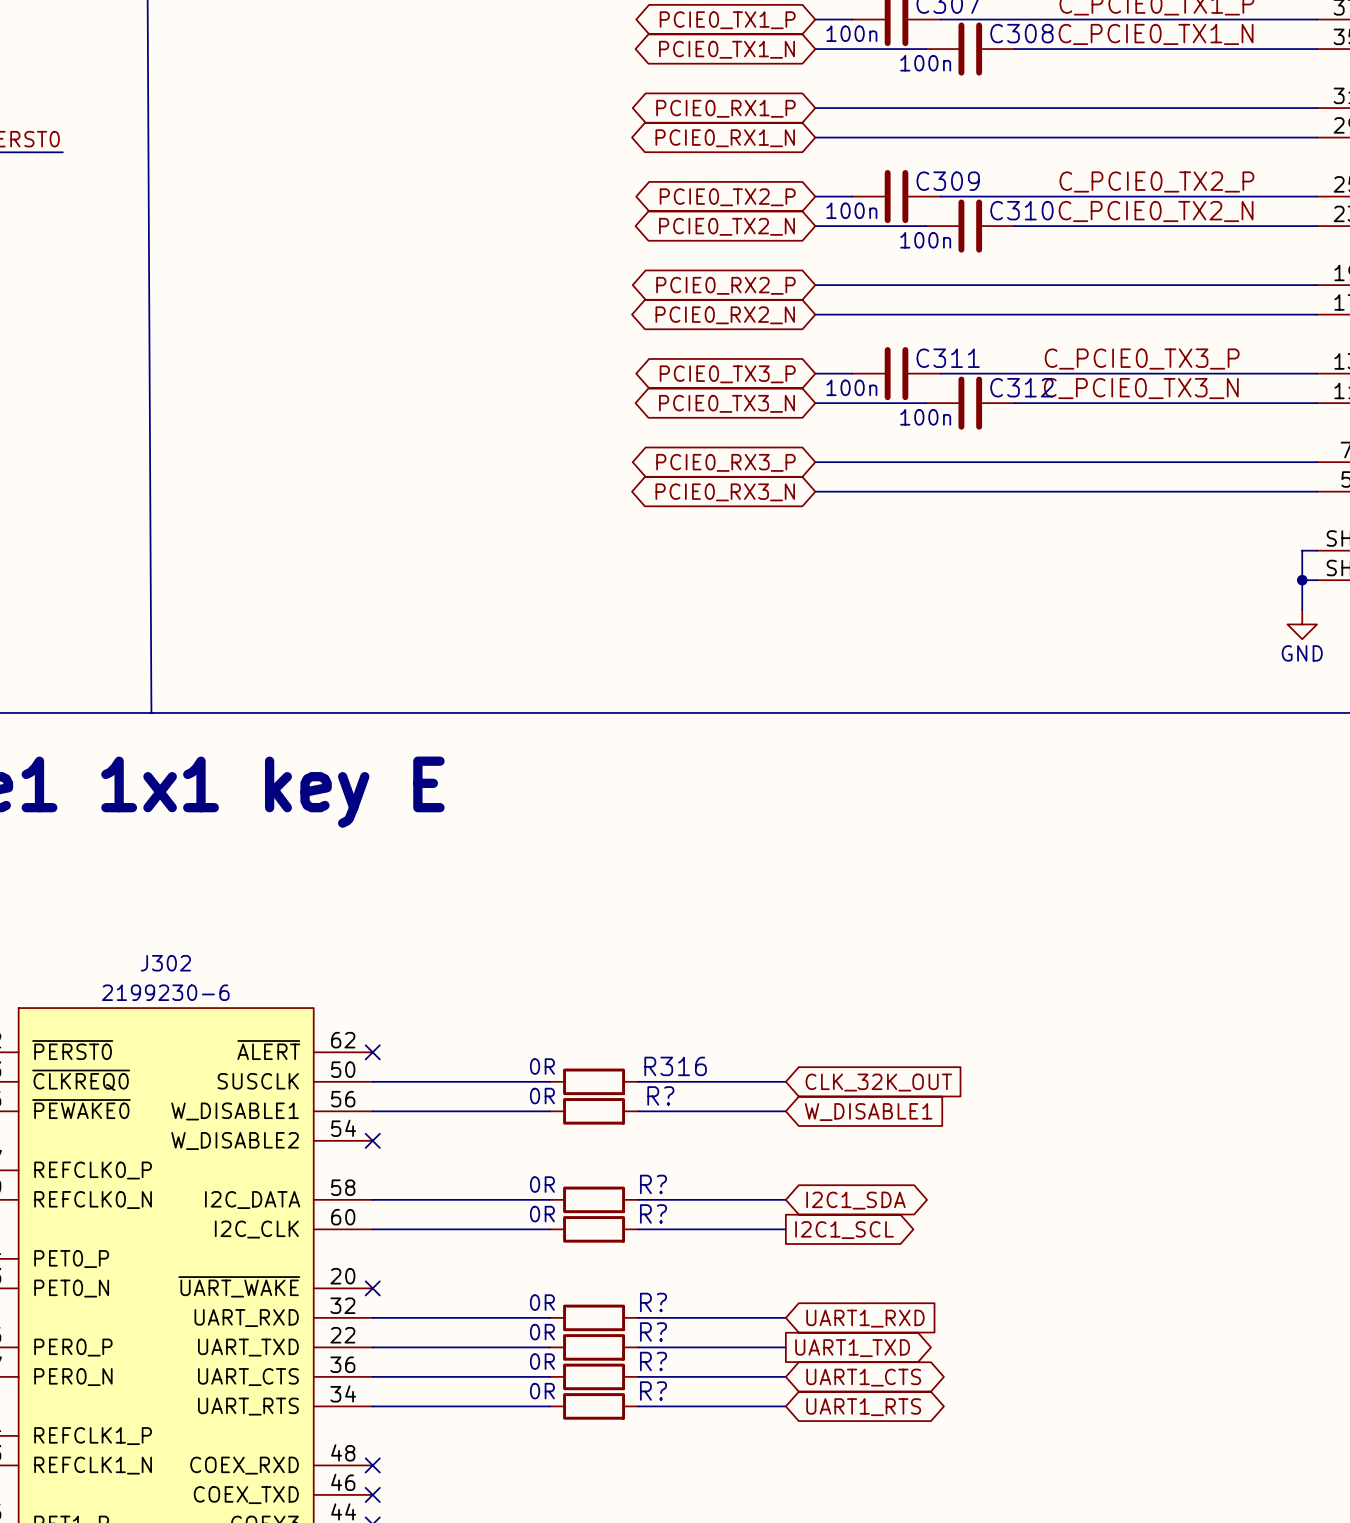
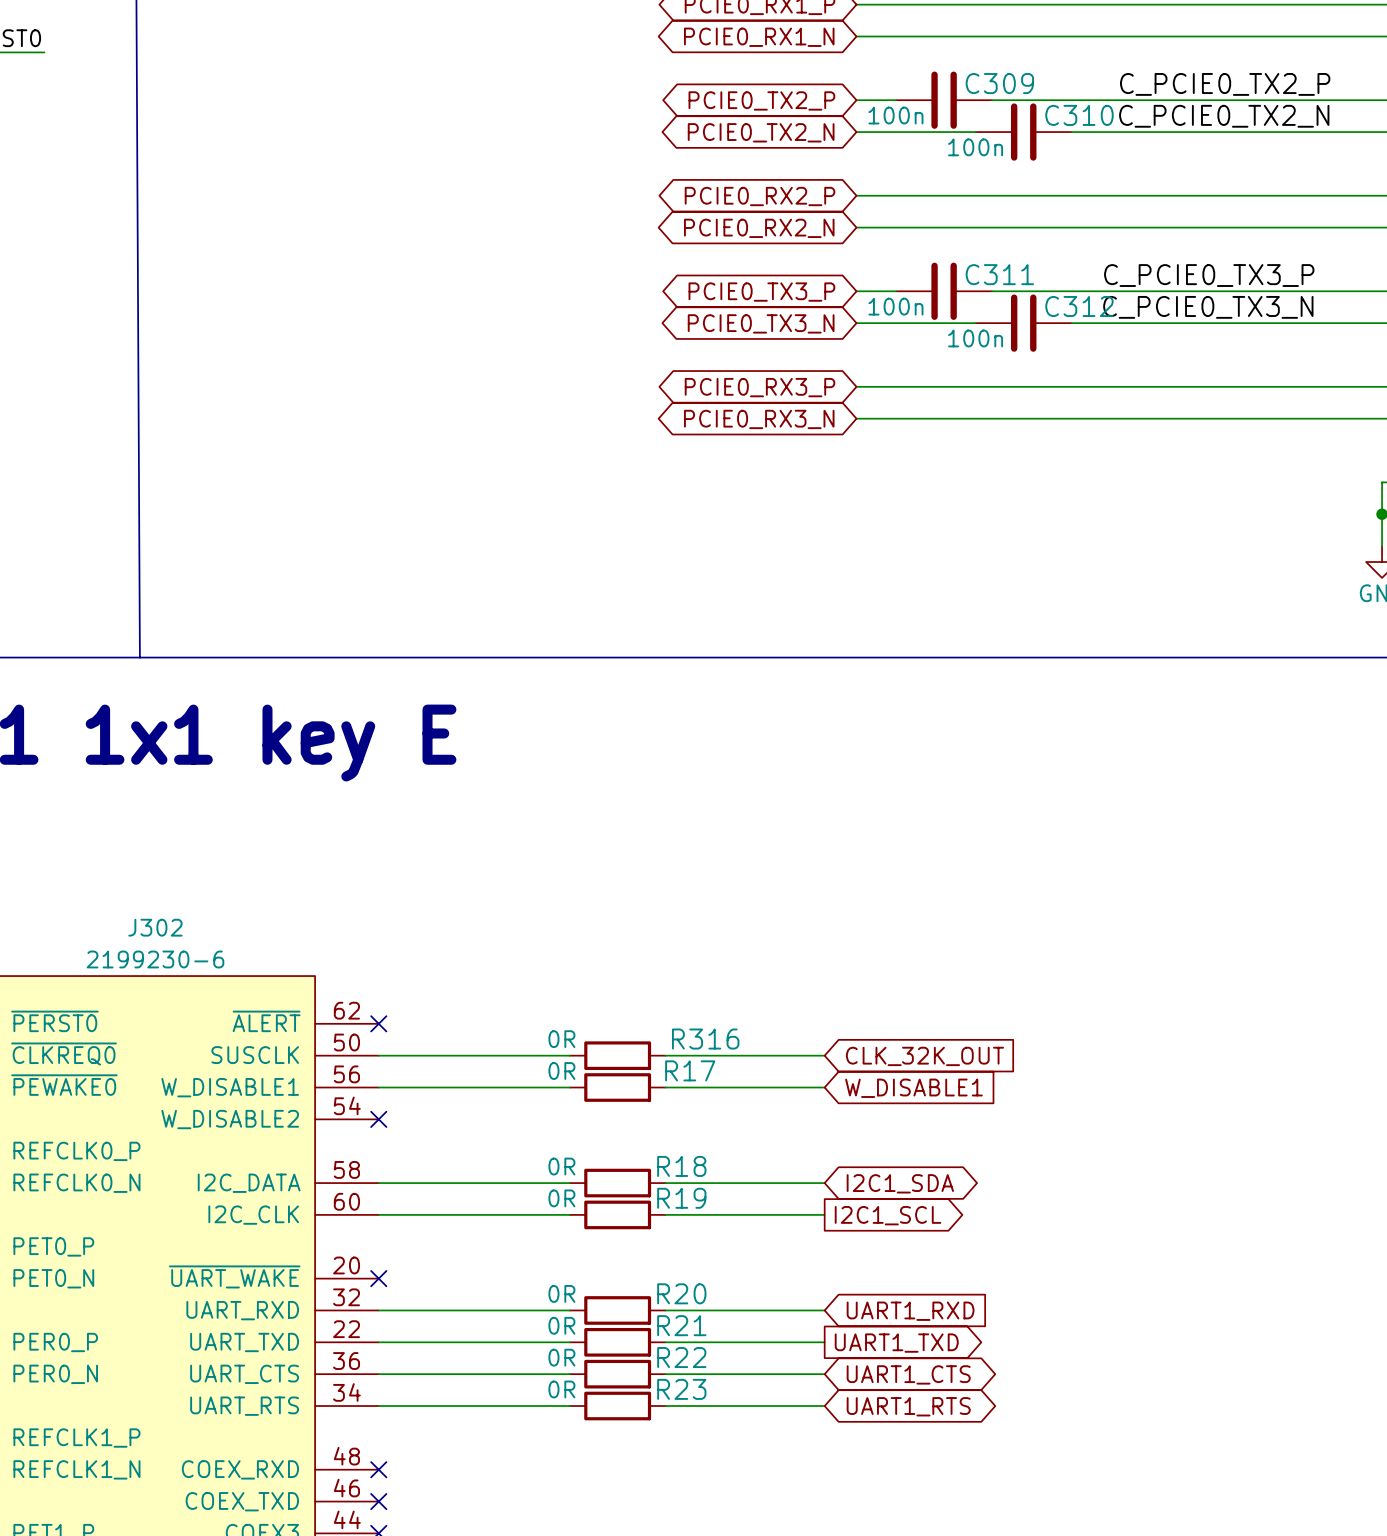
R? name: R? (660, 1095) -> R17 (690, 1070)
R? name: R? (653, 1184) -> R18 (681, 1166)
R? name: R? (653, 1213) -> R19 (681, 1198)
R? name: R? (653, 1302) -> R20 (681, 1293)
R? name: R? (653, 1331) -> R21 (681, 1325)
R? name: R? (653, 1361) -> R22 (681, 1357)
R? name: R? (653, 1391) -> R23 (681, 1389)

